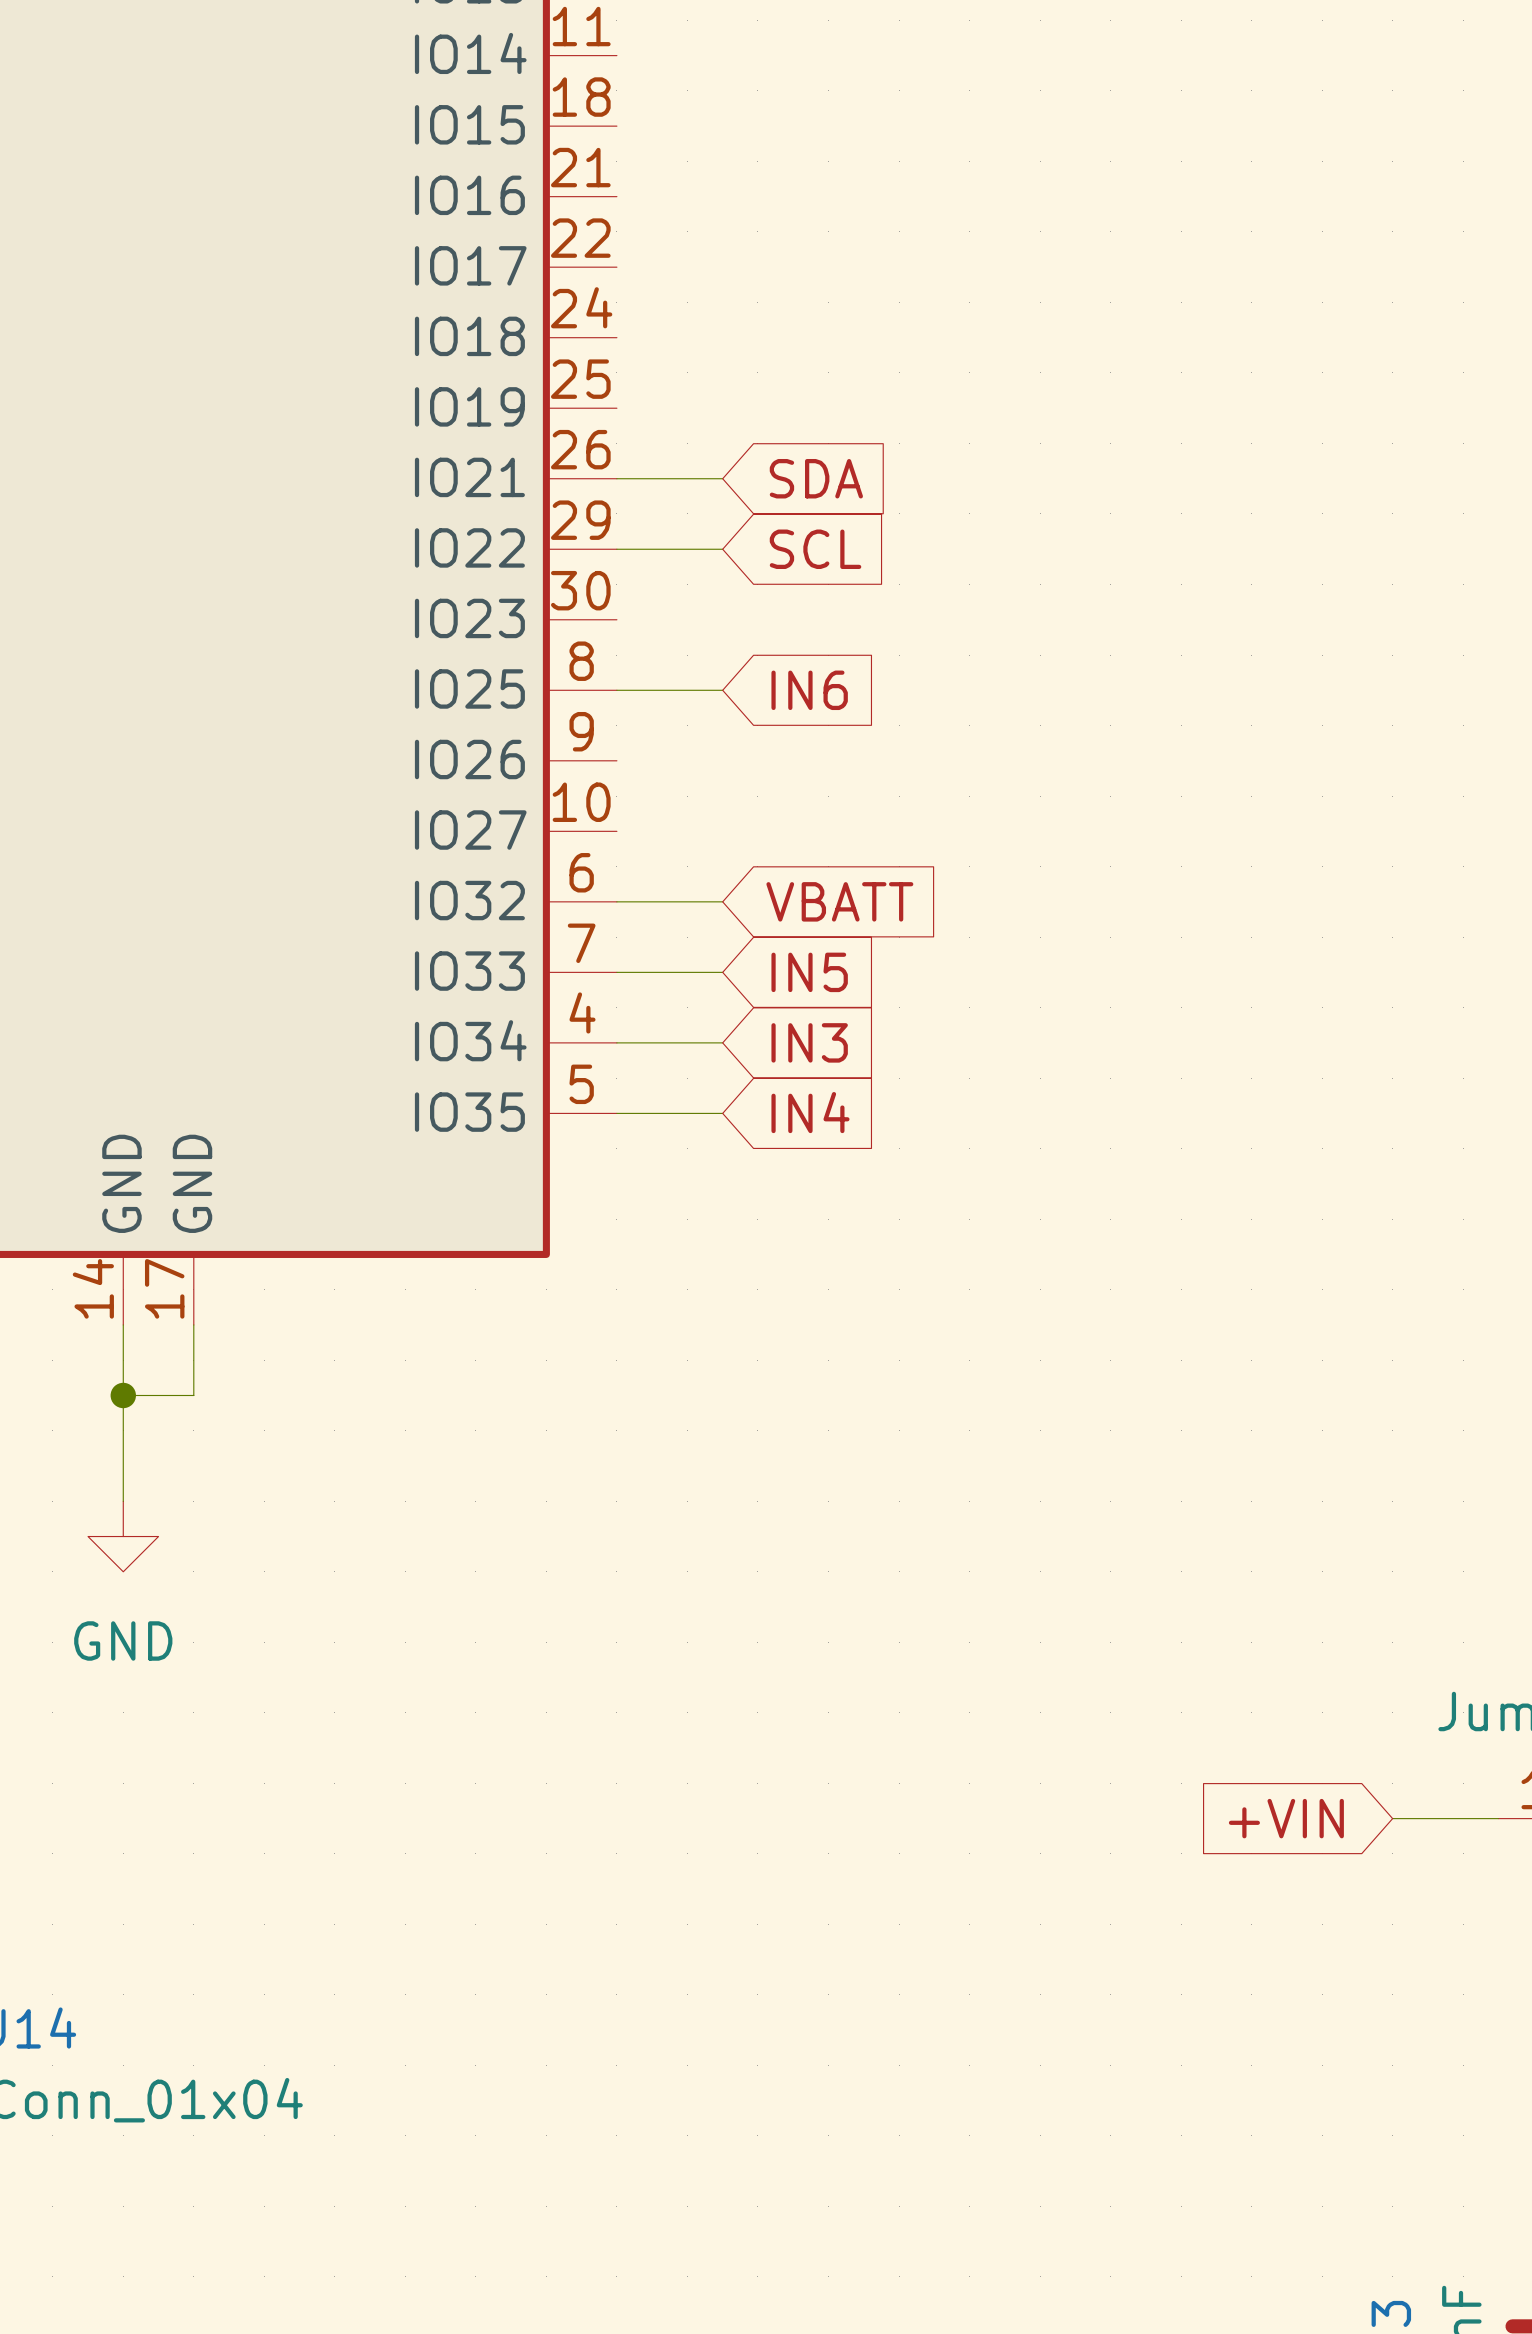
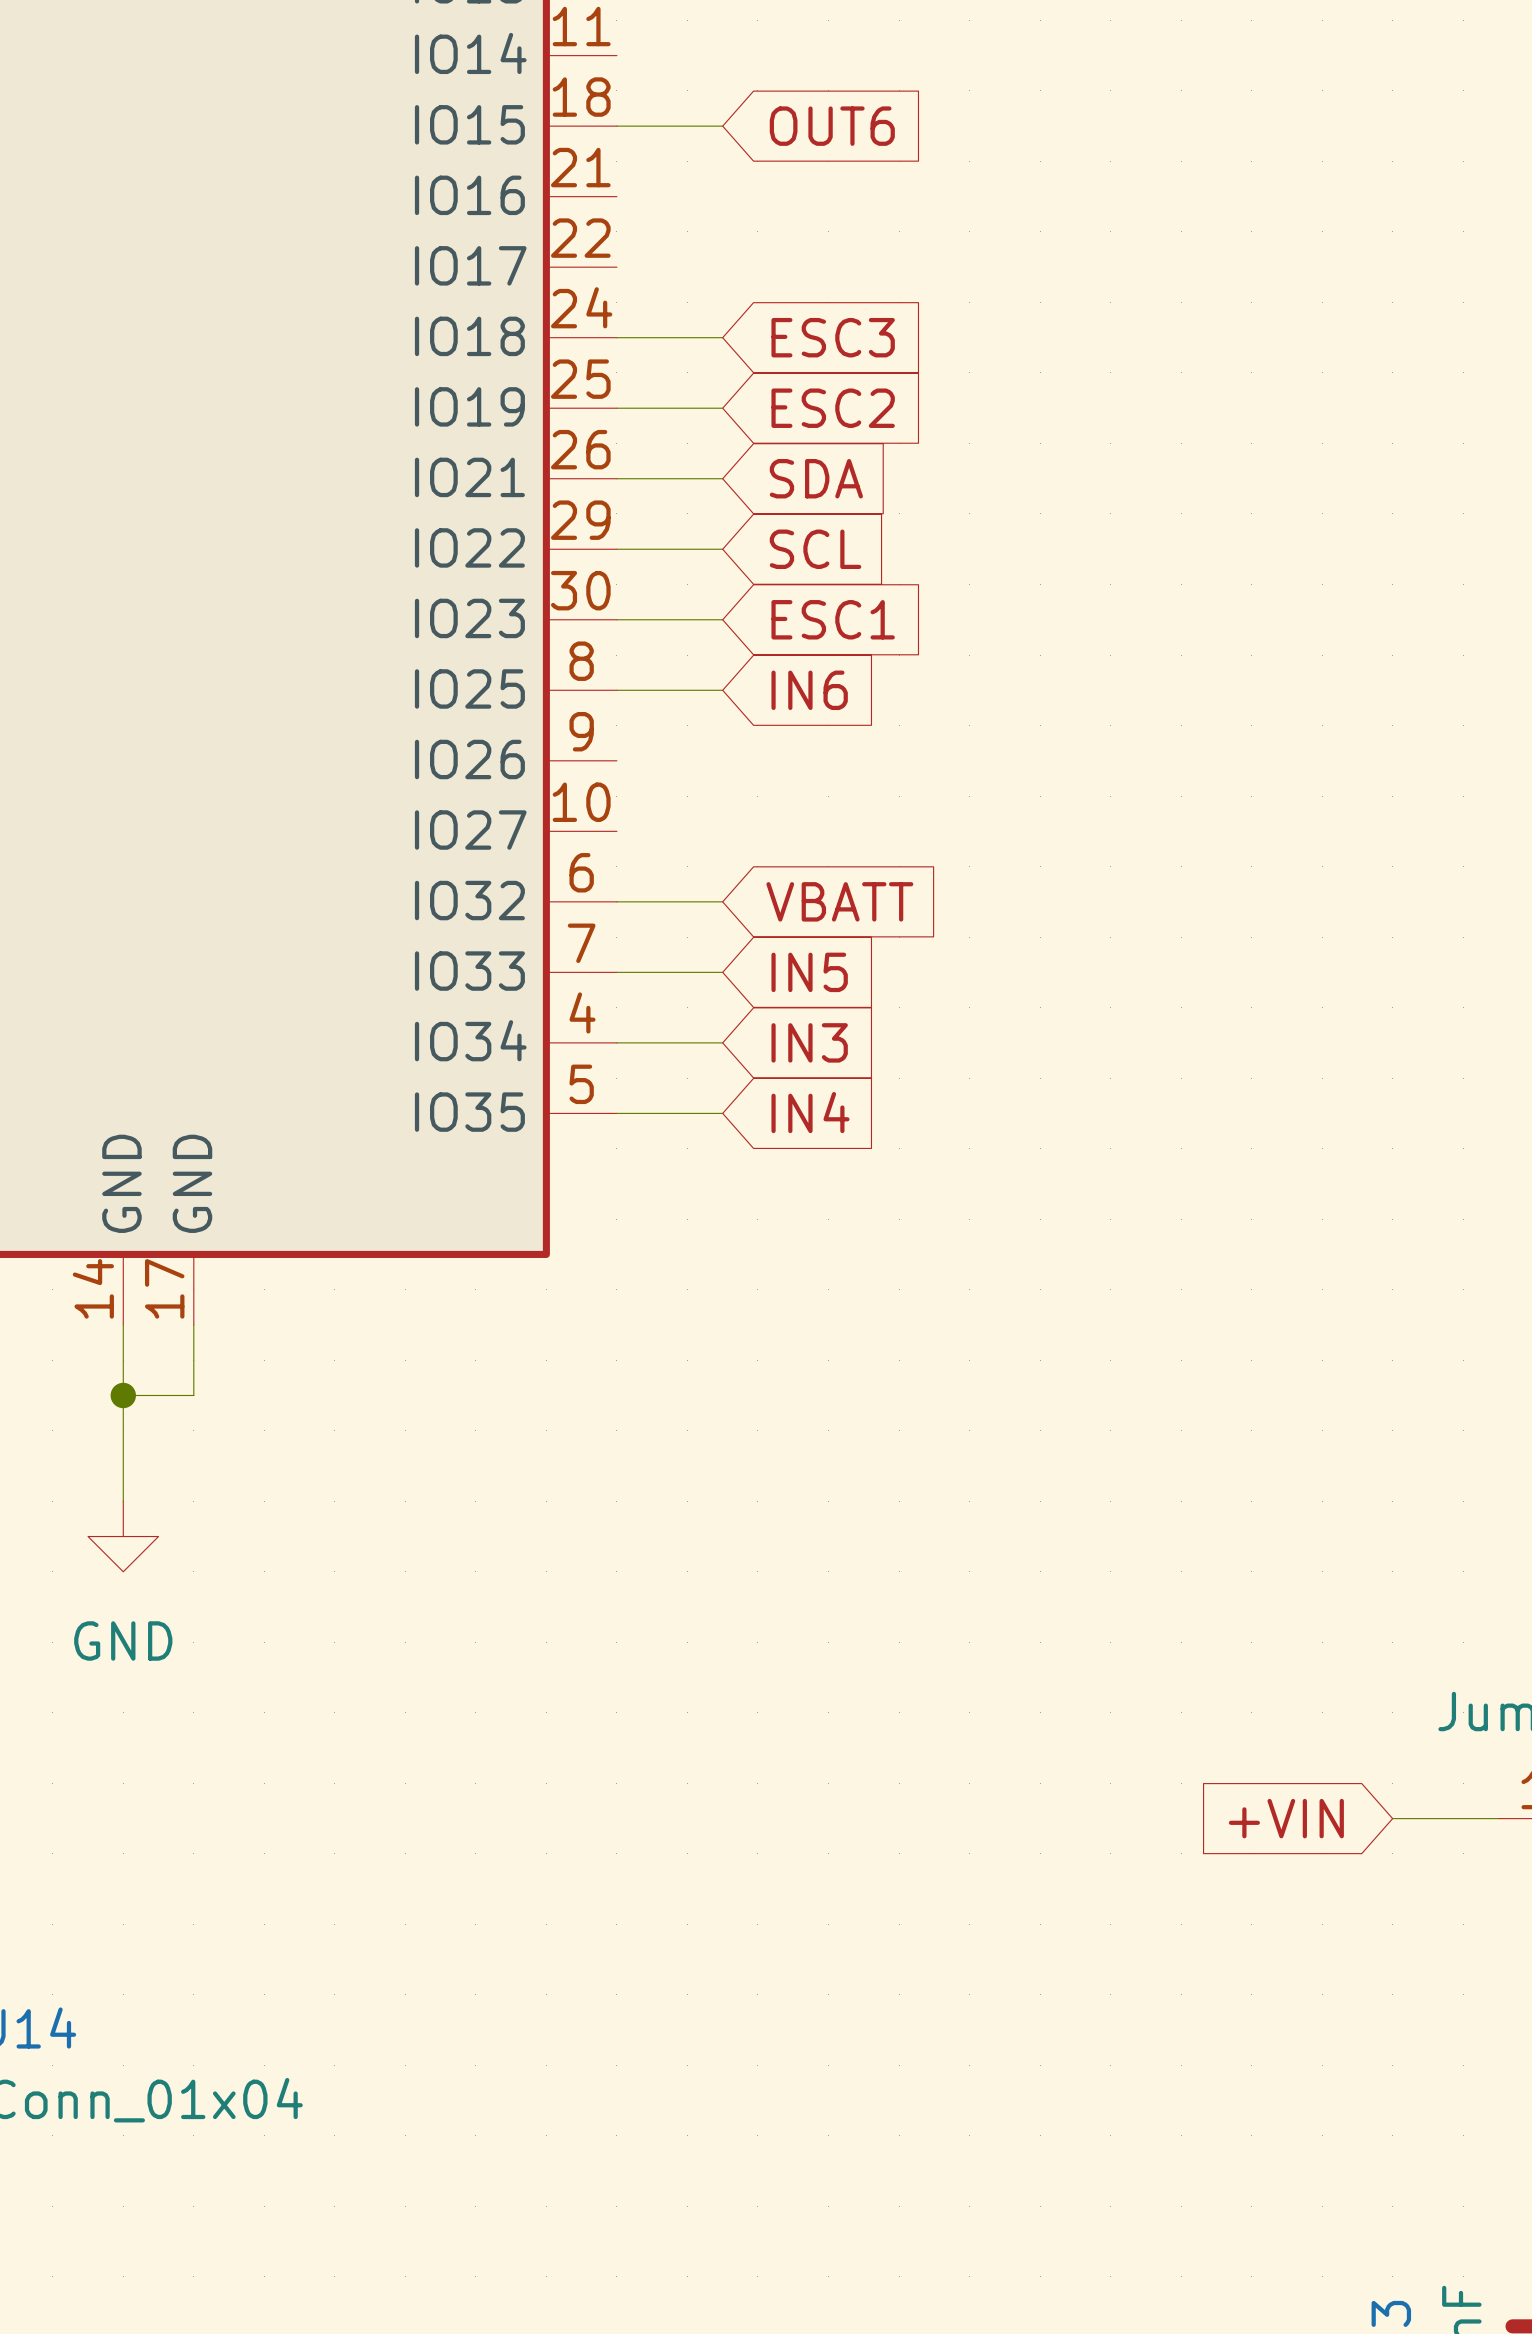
wire: none -> (616, 126) (722, 126)
global label: none -> OUT6 (832, 126)
wire: none -> (616, 337) (722, 337)
global label: none -> ESC3 (833, 337)
wire: none -> (616, 408) (722, 408)
global label: none -> ESC2 (833, 408)
wire: none -> (616, 619) (722, 619)
global label: none -> ESC1 (833, 619)

